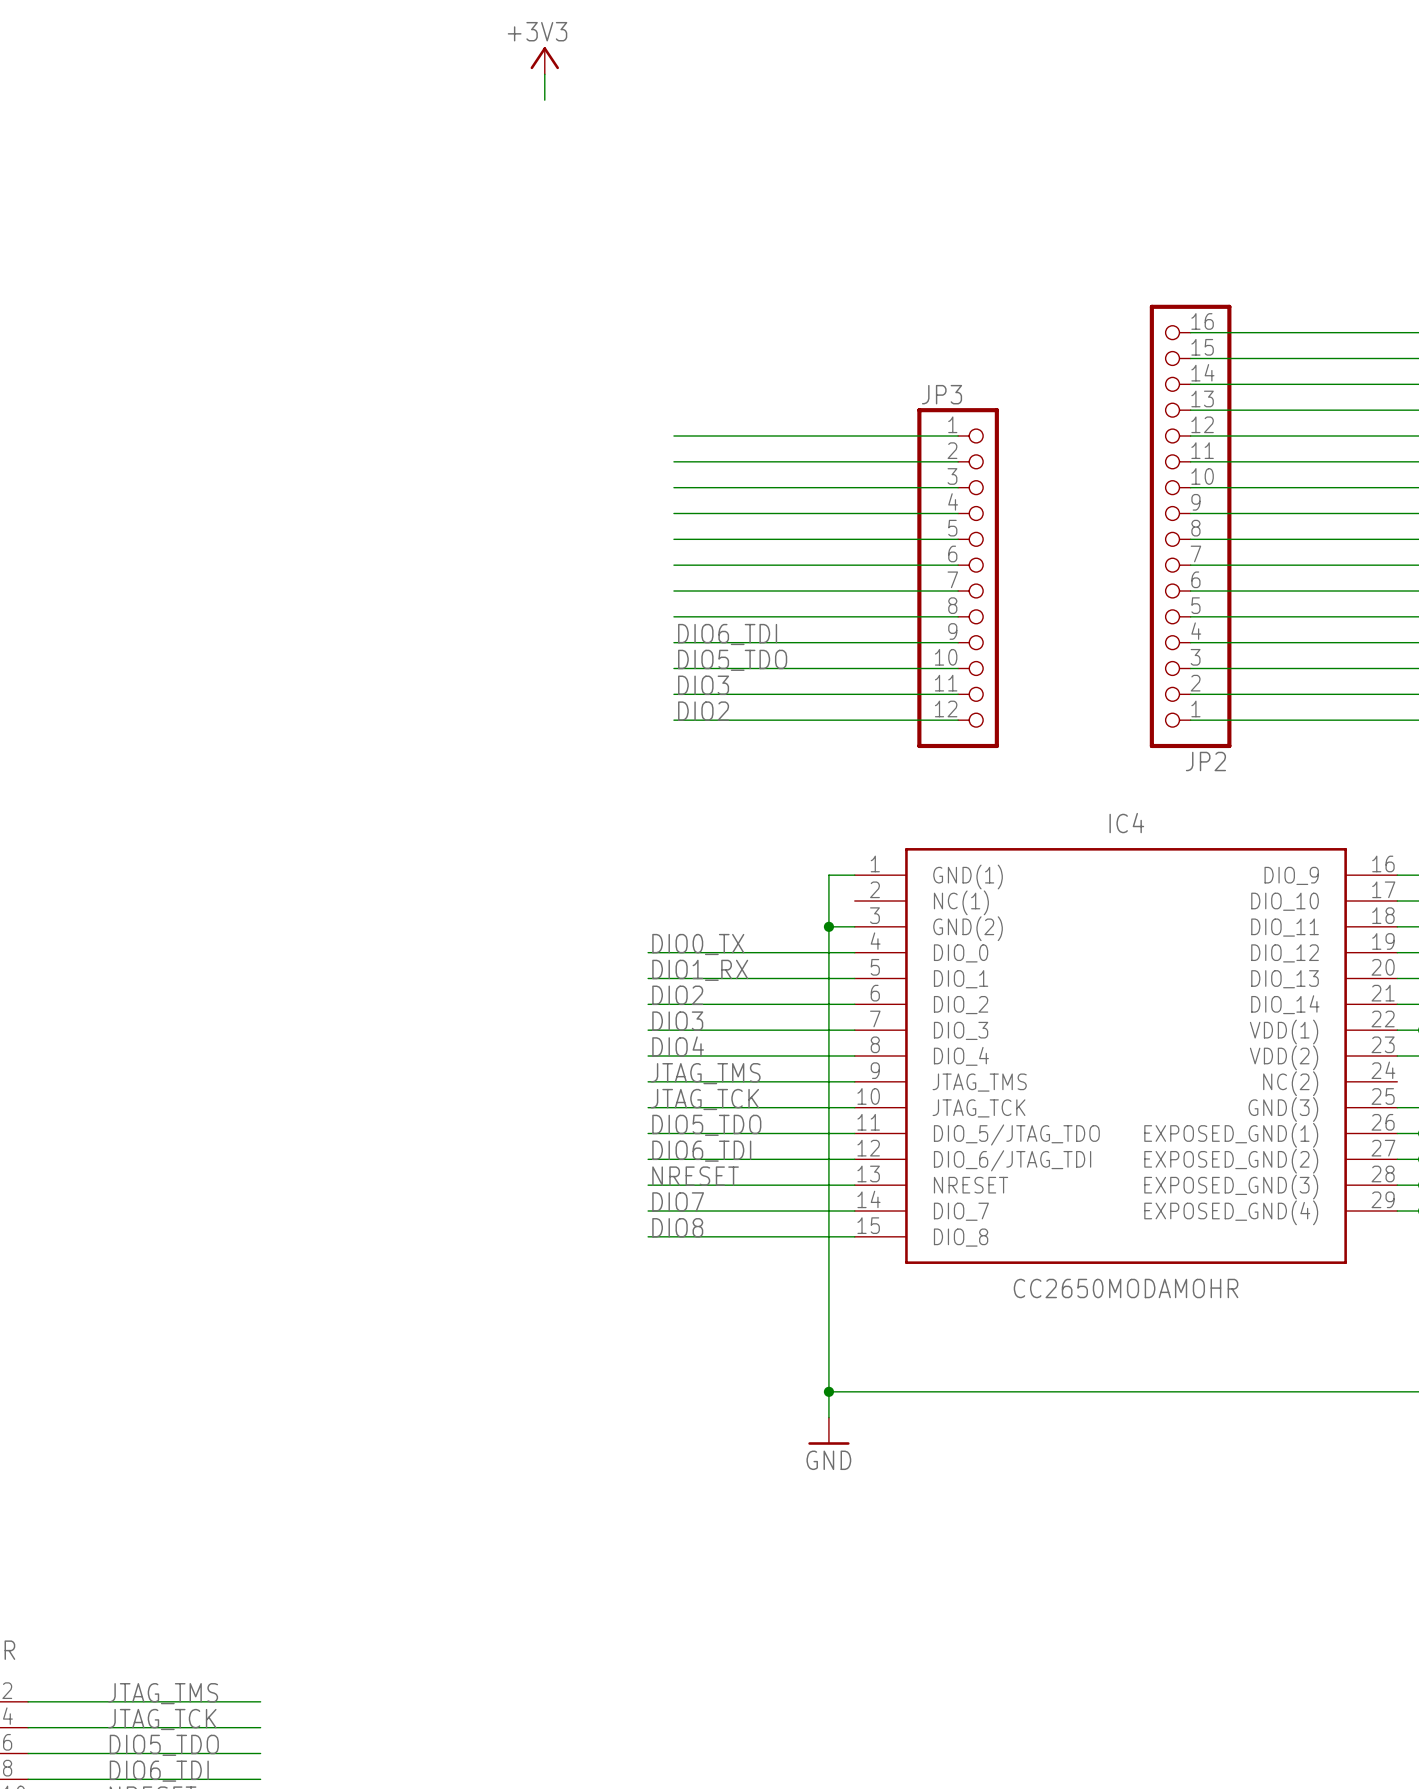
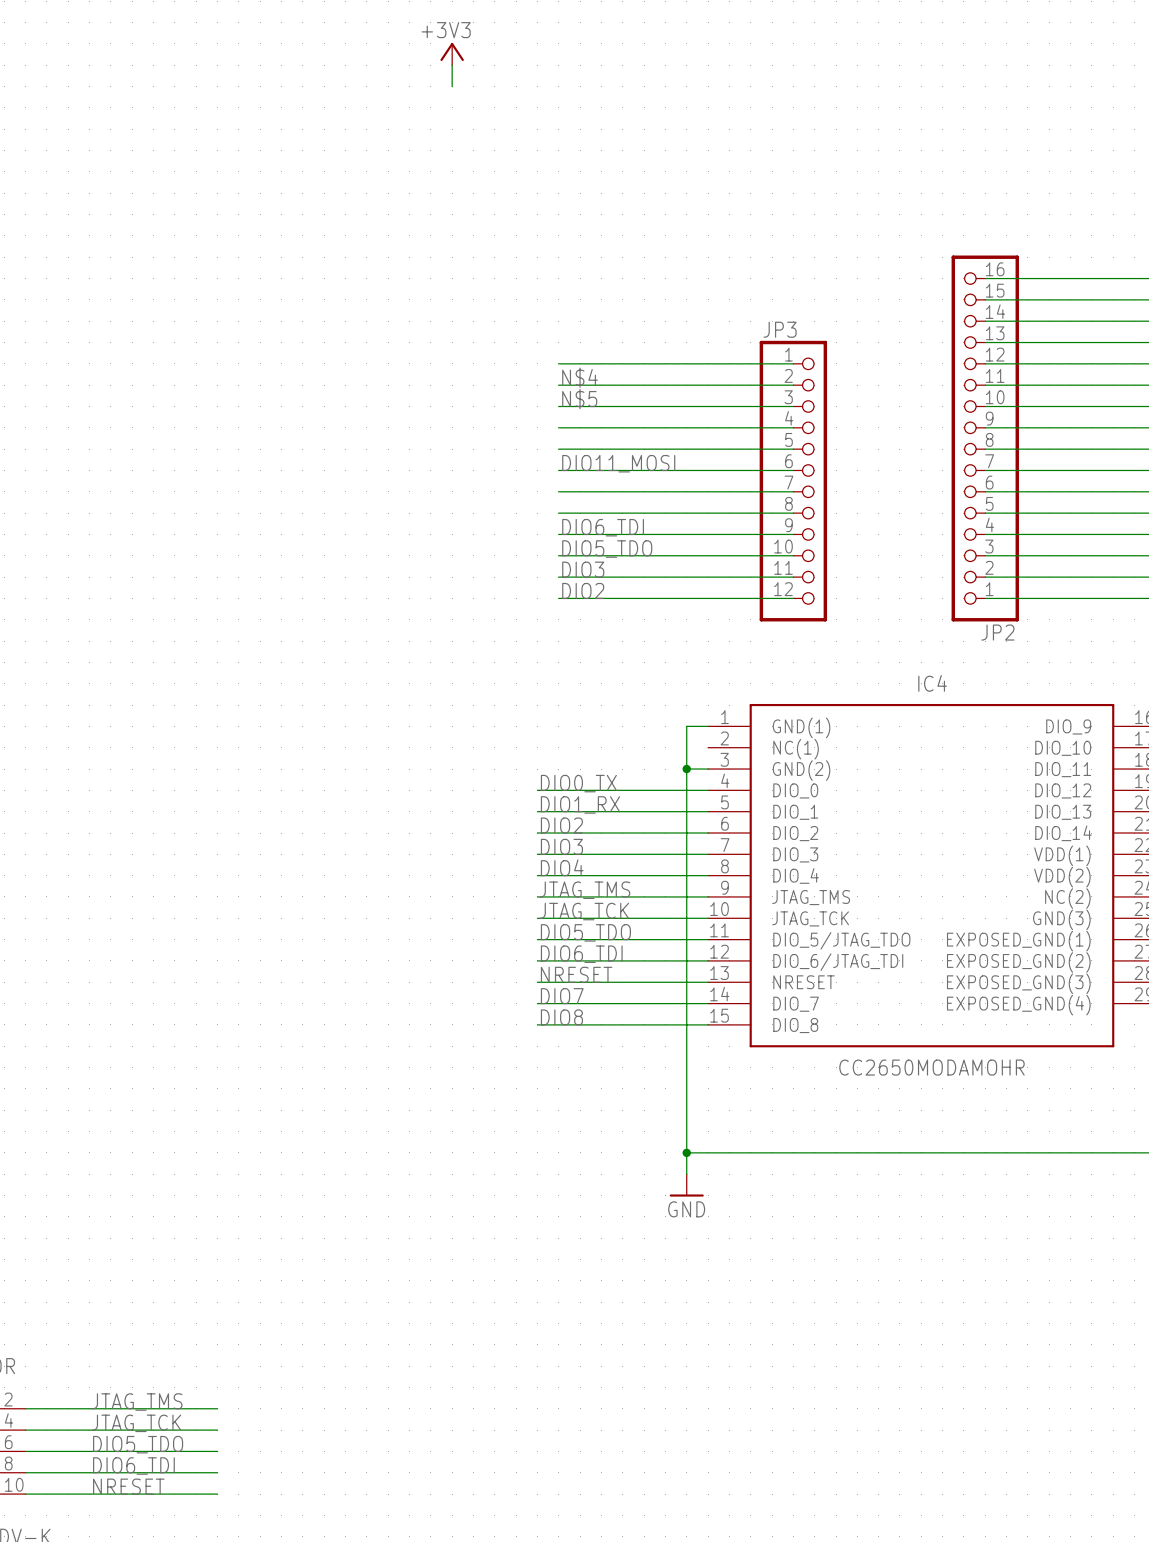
label: none -> N$4 (580, 377)
label: none -> N$5 (579, 399)
label: none -> DIO11_MOSI (618, 463)

